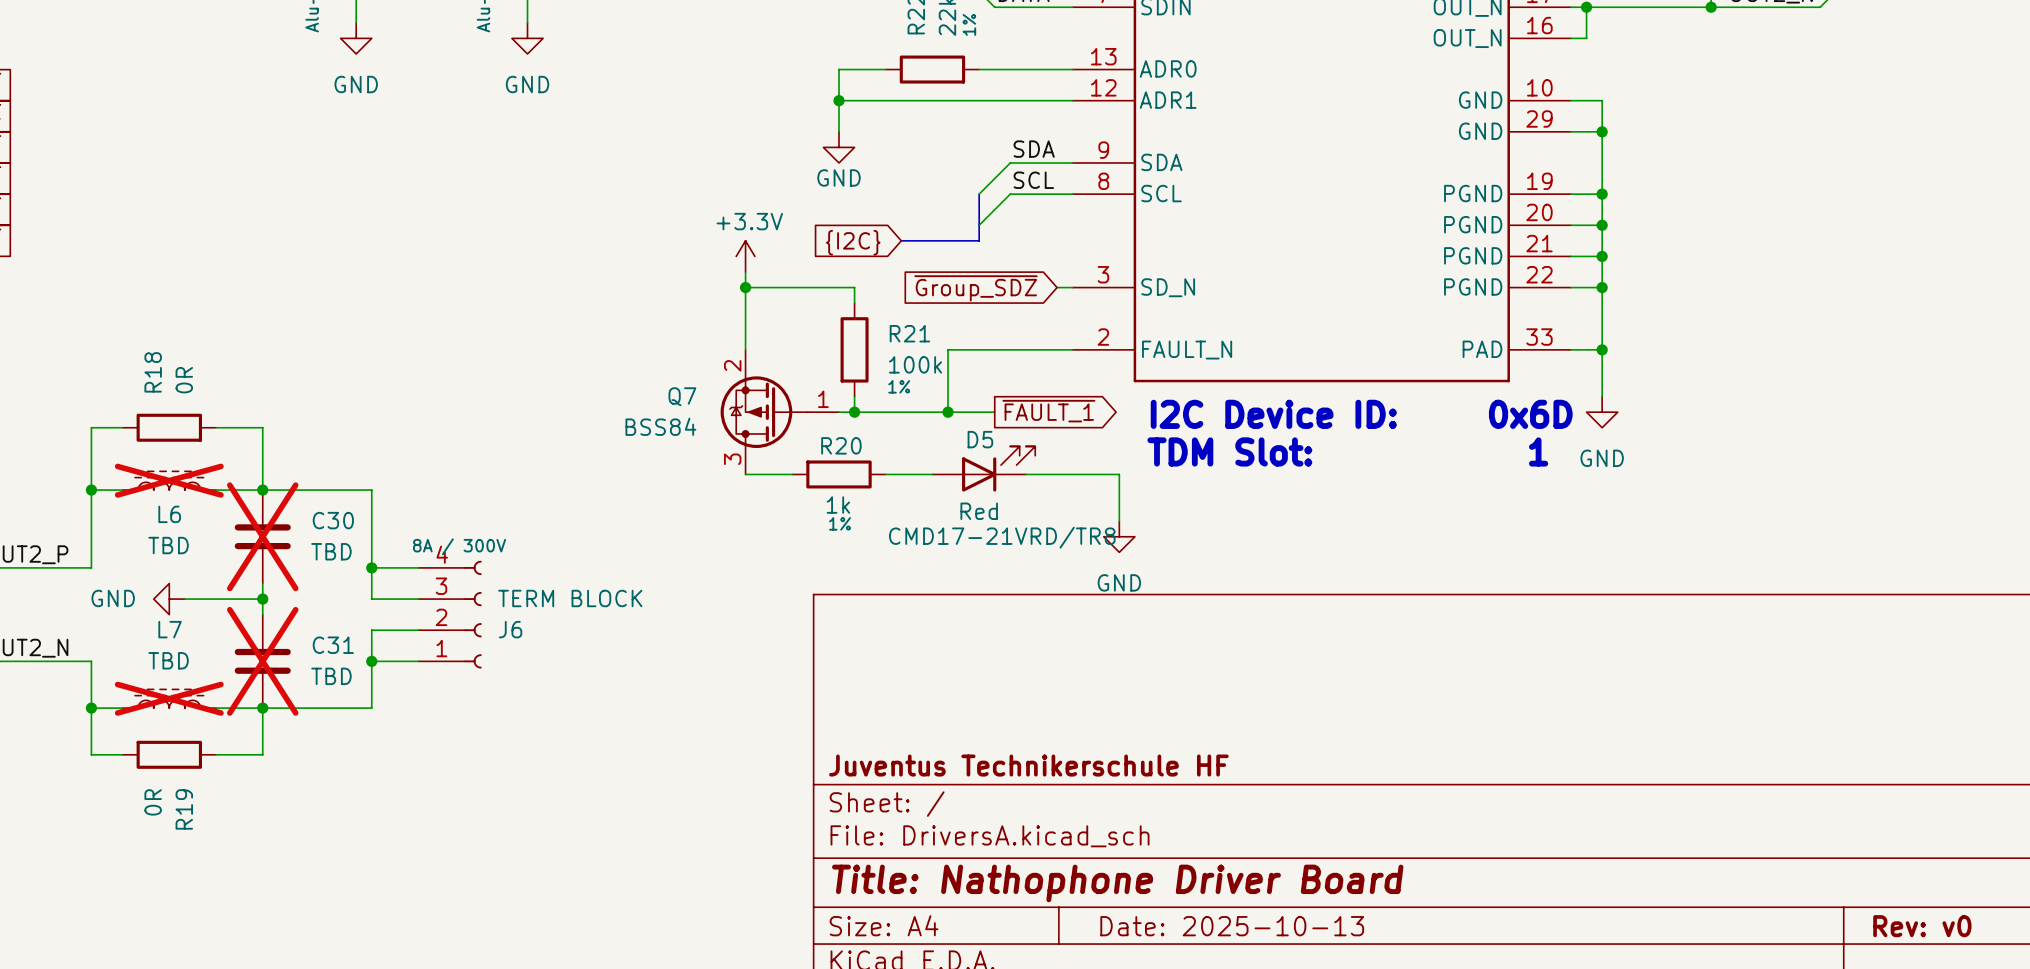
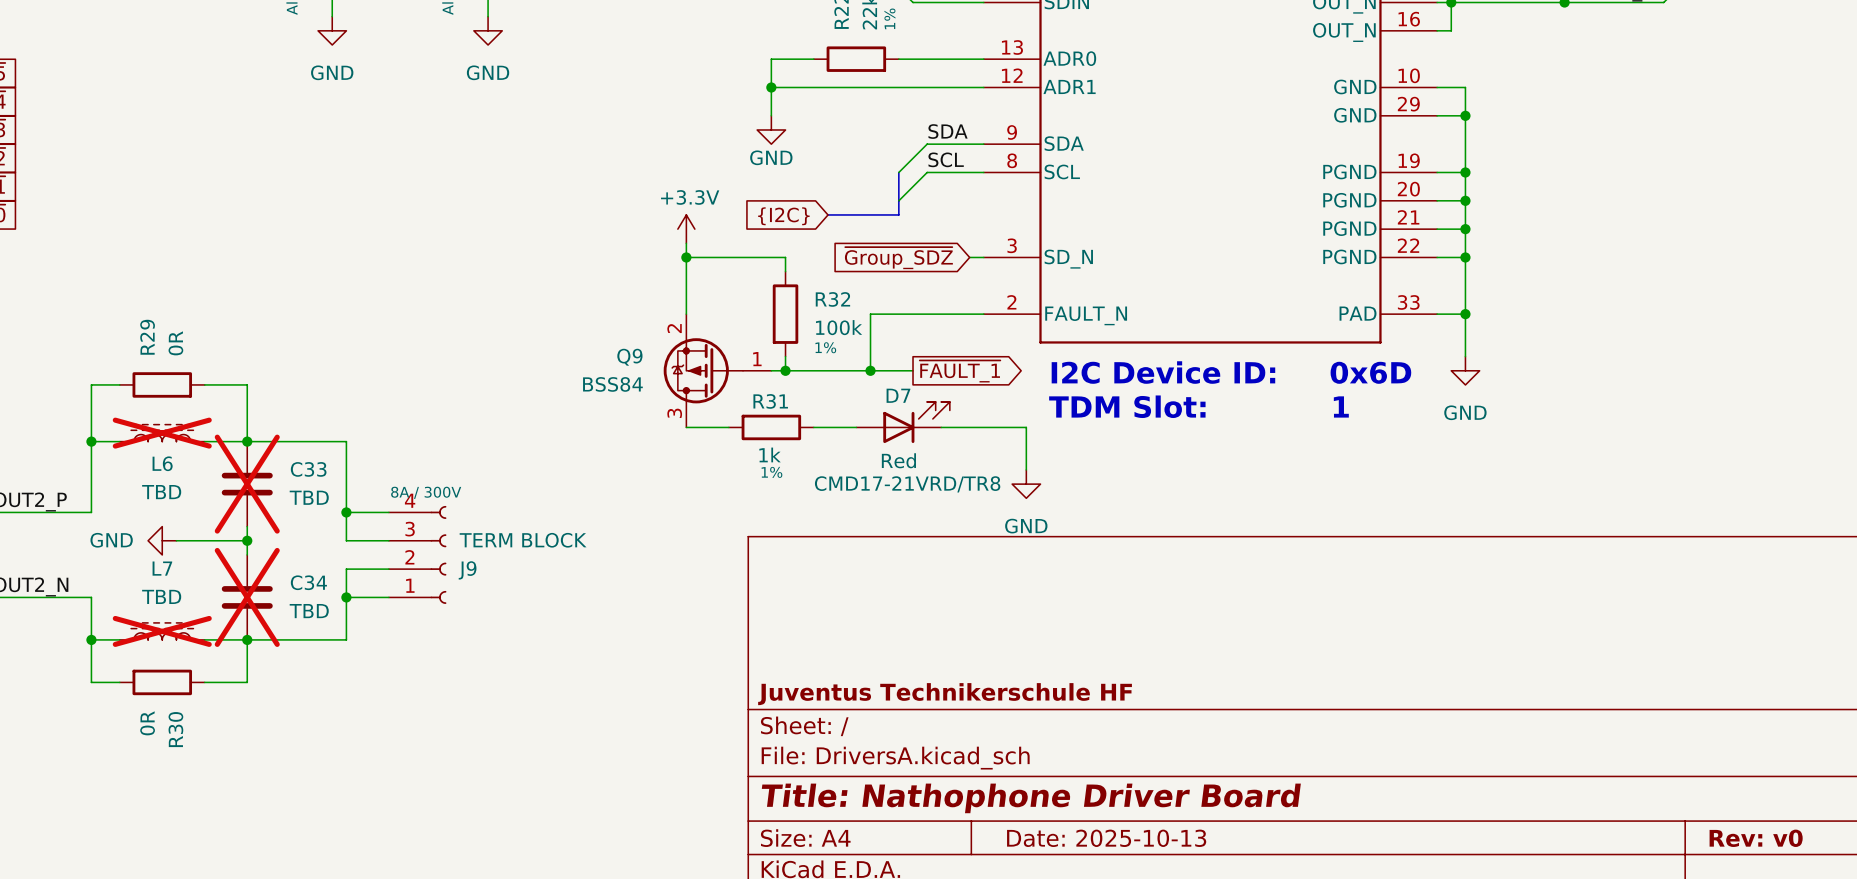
R21 name: R21 (909, 333) -> R32 (832, 299)
R18 name: R18 (153, 372) -> R29 (147, 337)
Q7 name: Q7 (682, 396) -> Q9 (629, 357)
D5 name: D5 (980, 439) -> D7 (898, 395)
R20 name: R20 (841, 445) -> R31 (770, 401)
C30 name: C30 (333, 520) -> C33 (308, 469)
J6 name: J6 (510, 629) -> J9 (467, 570)
C31 name: C31 (333, 645) -> C34 (308, 582)
R19 name: R19 (184, 809) -> R30 (175, 729)

